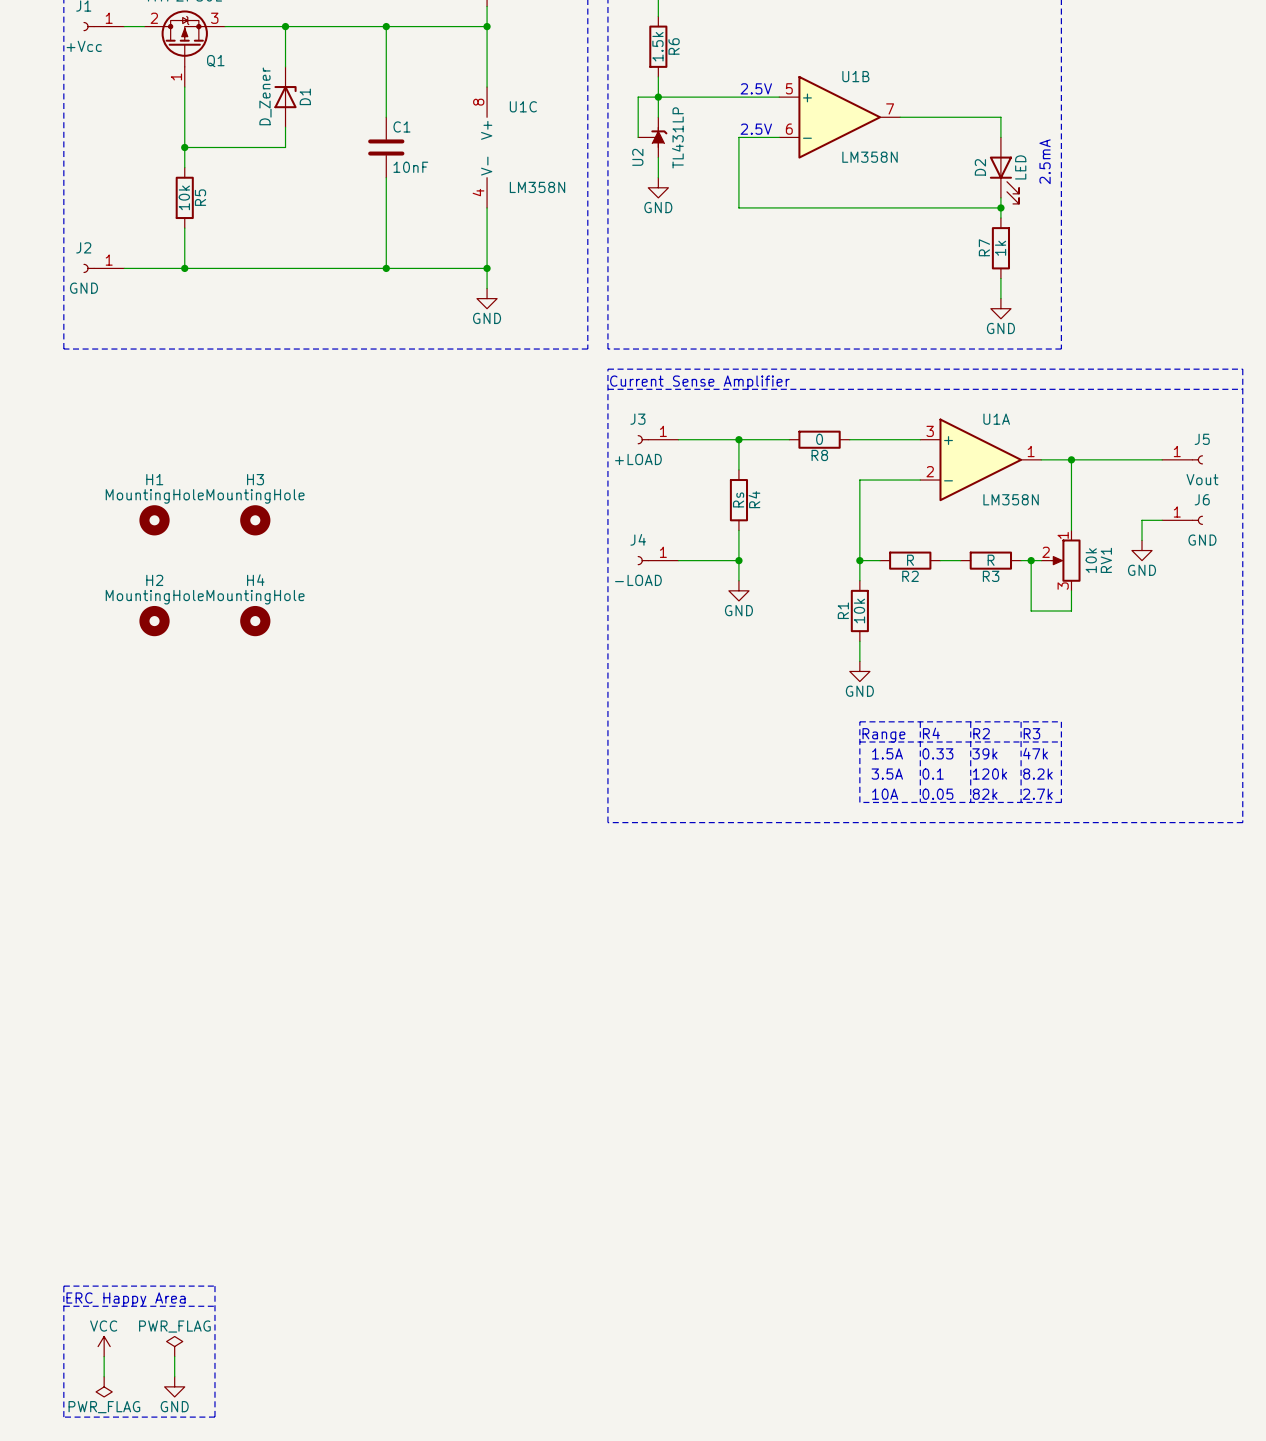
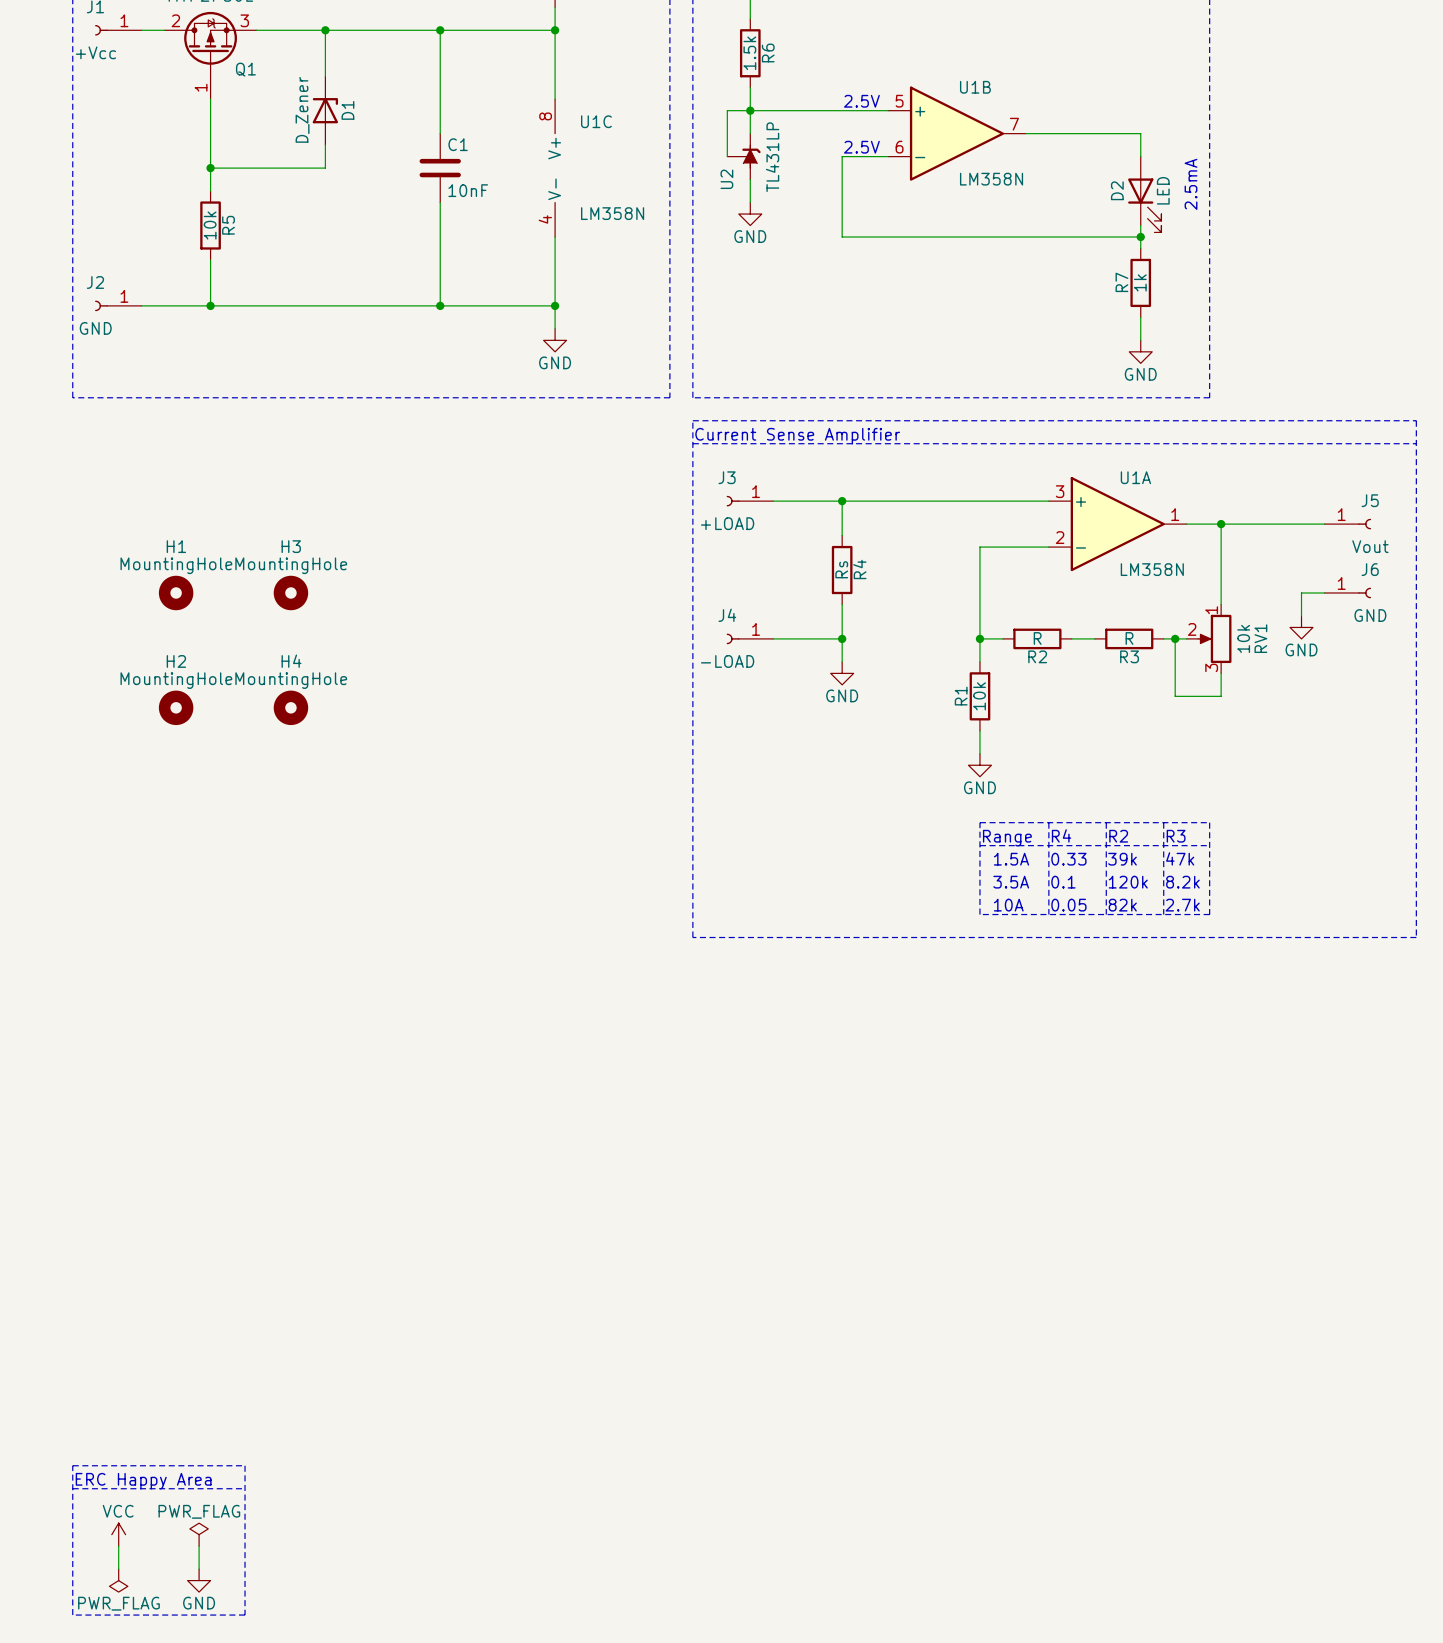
wire: none -> (899, 501) (968, 501)
R8: 0 (819, 439) -> none

